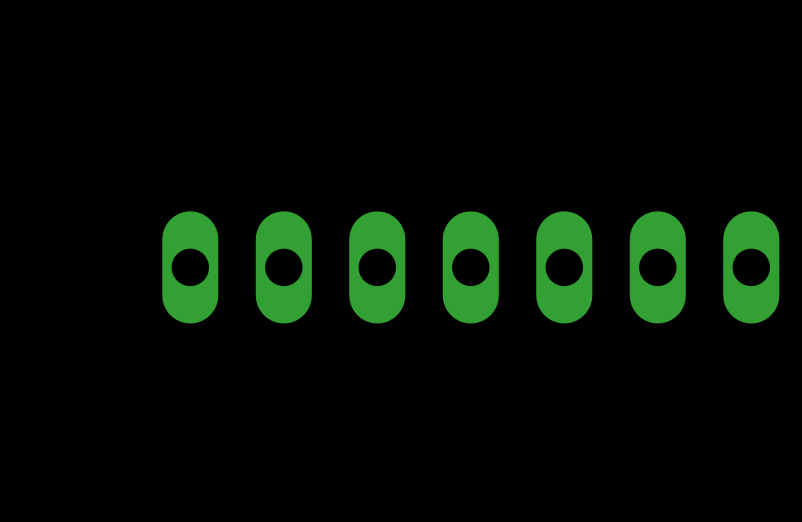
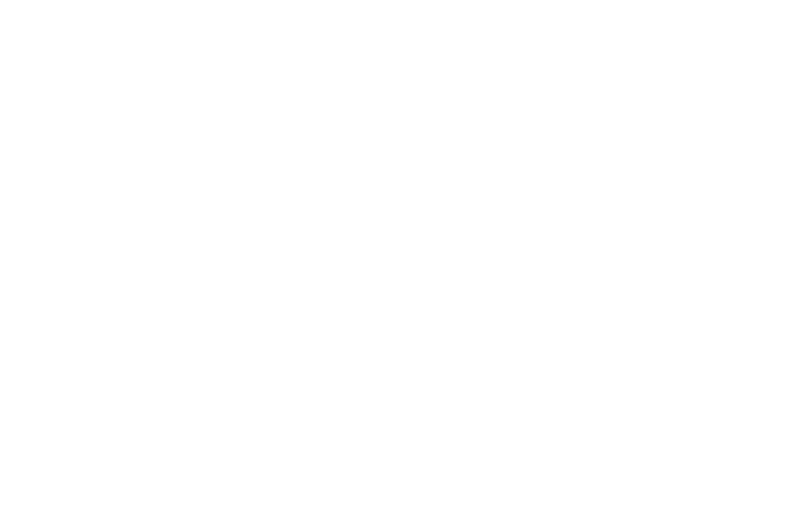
part: (470, 267) -> none

